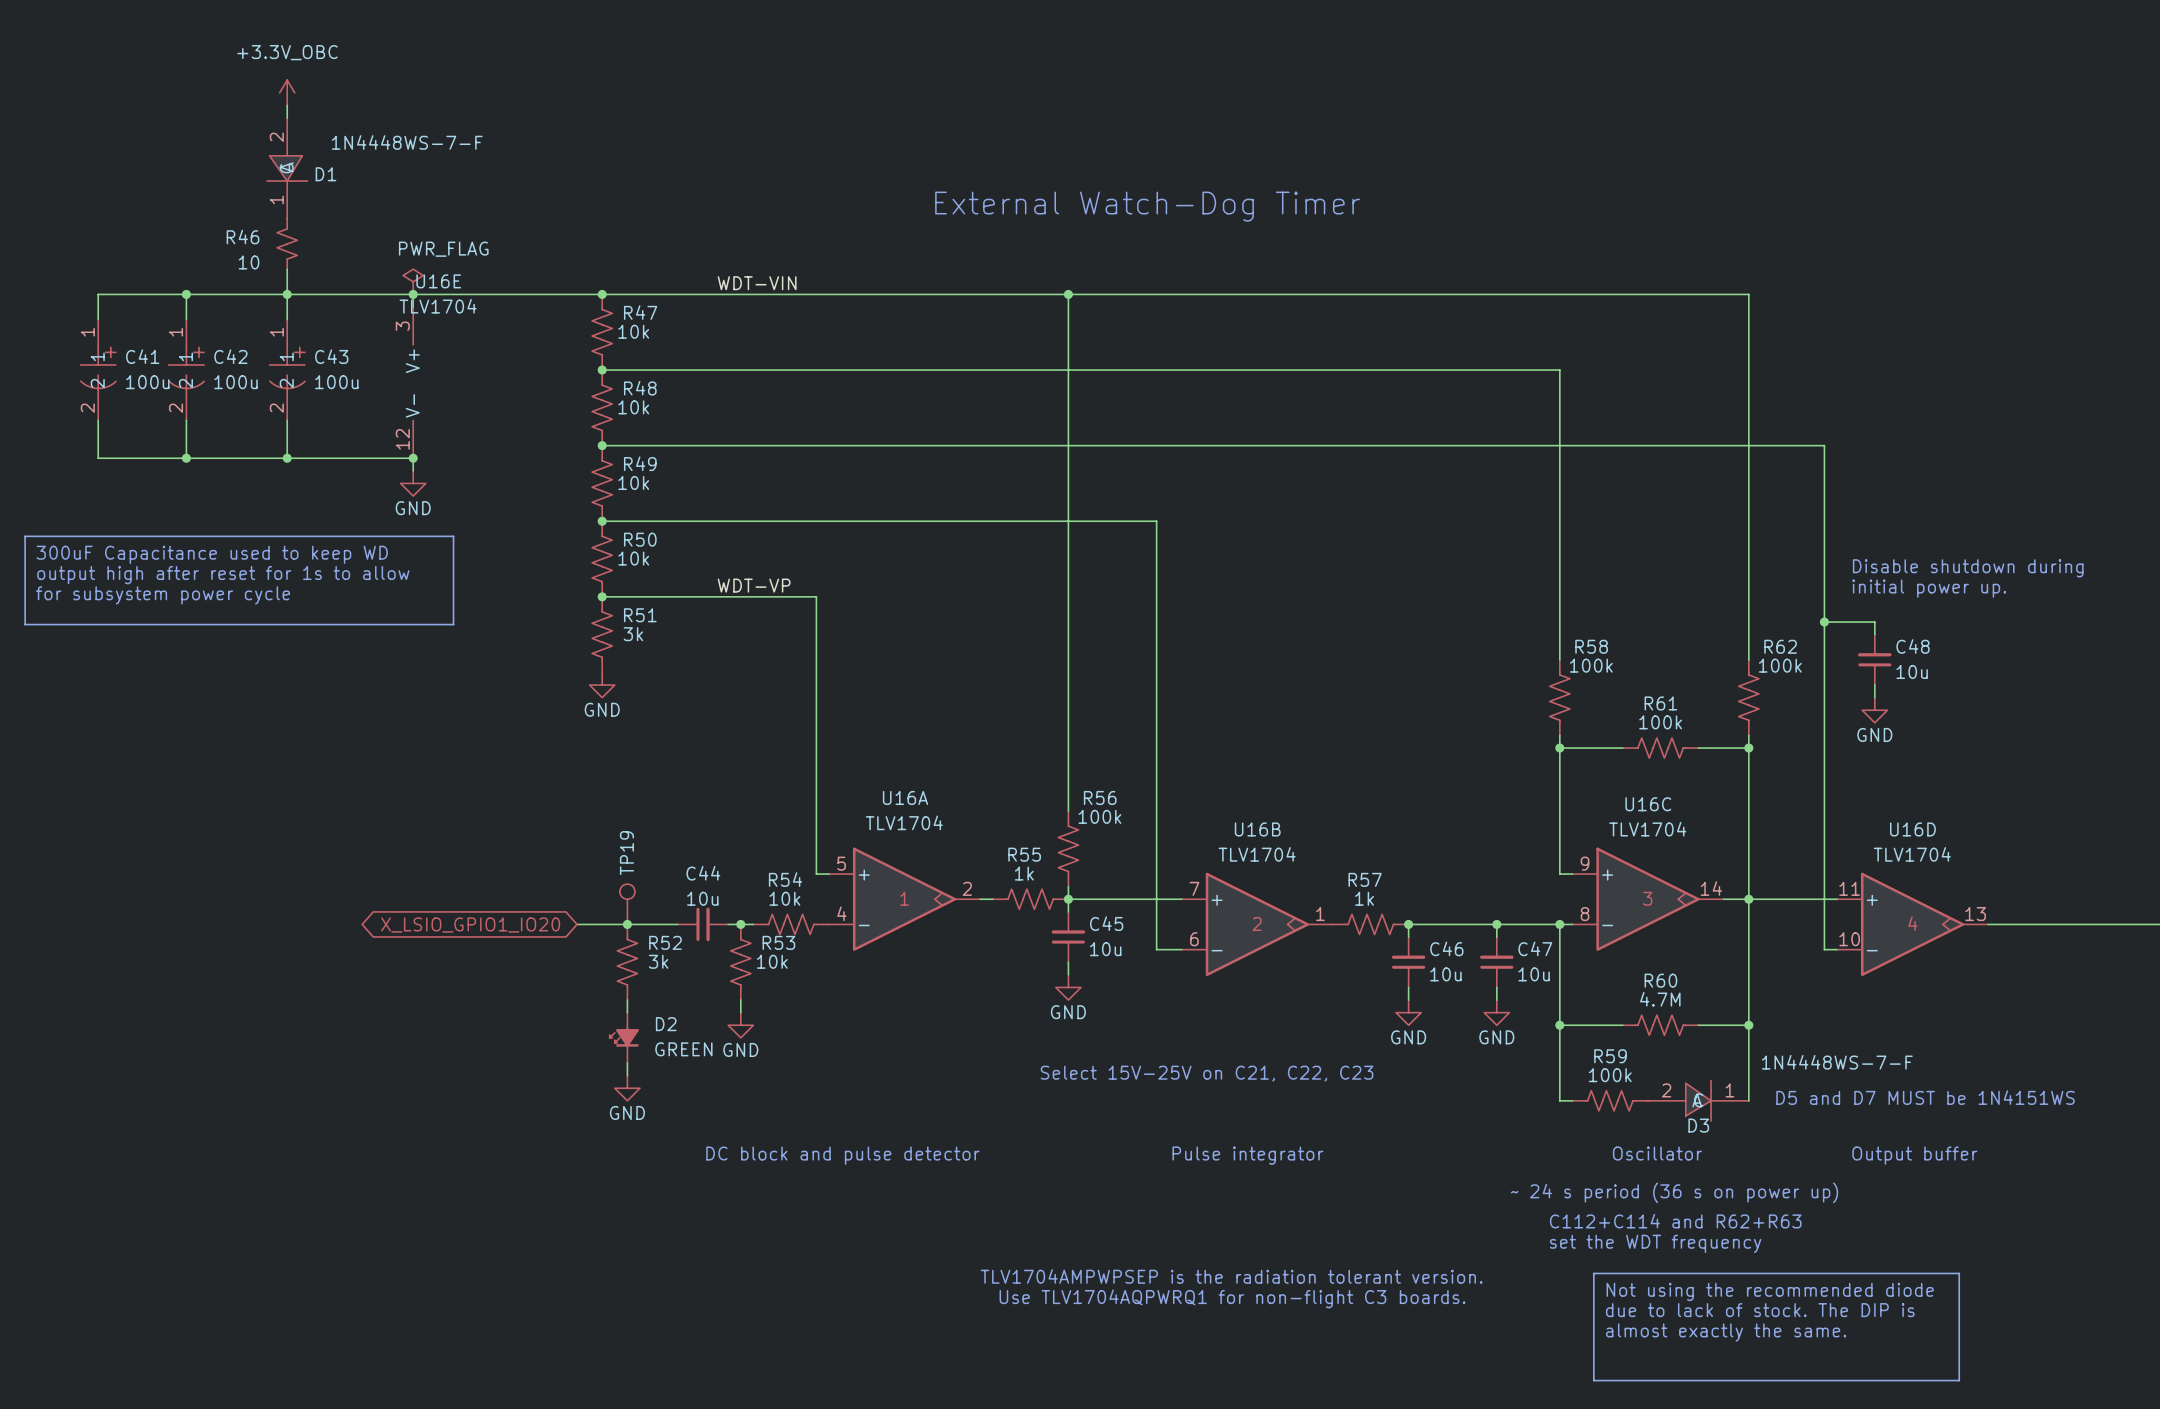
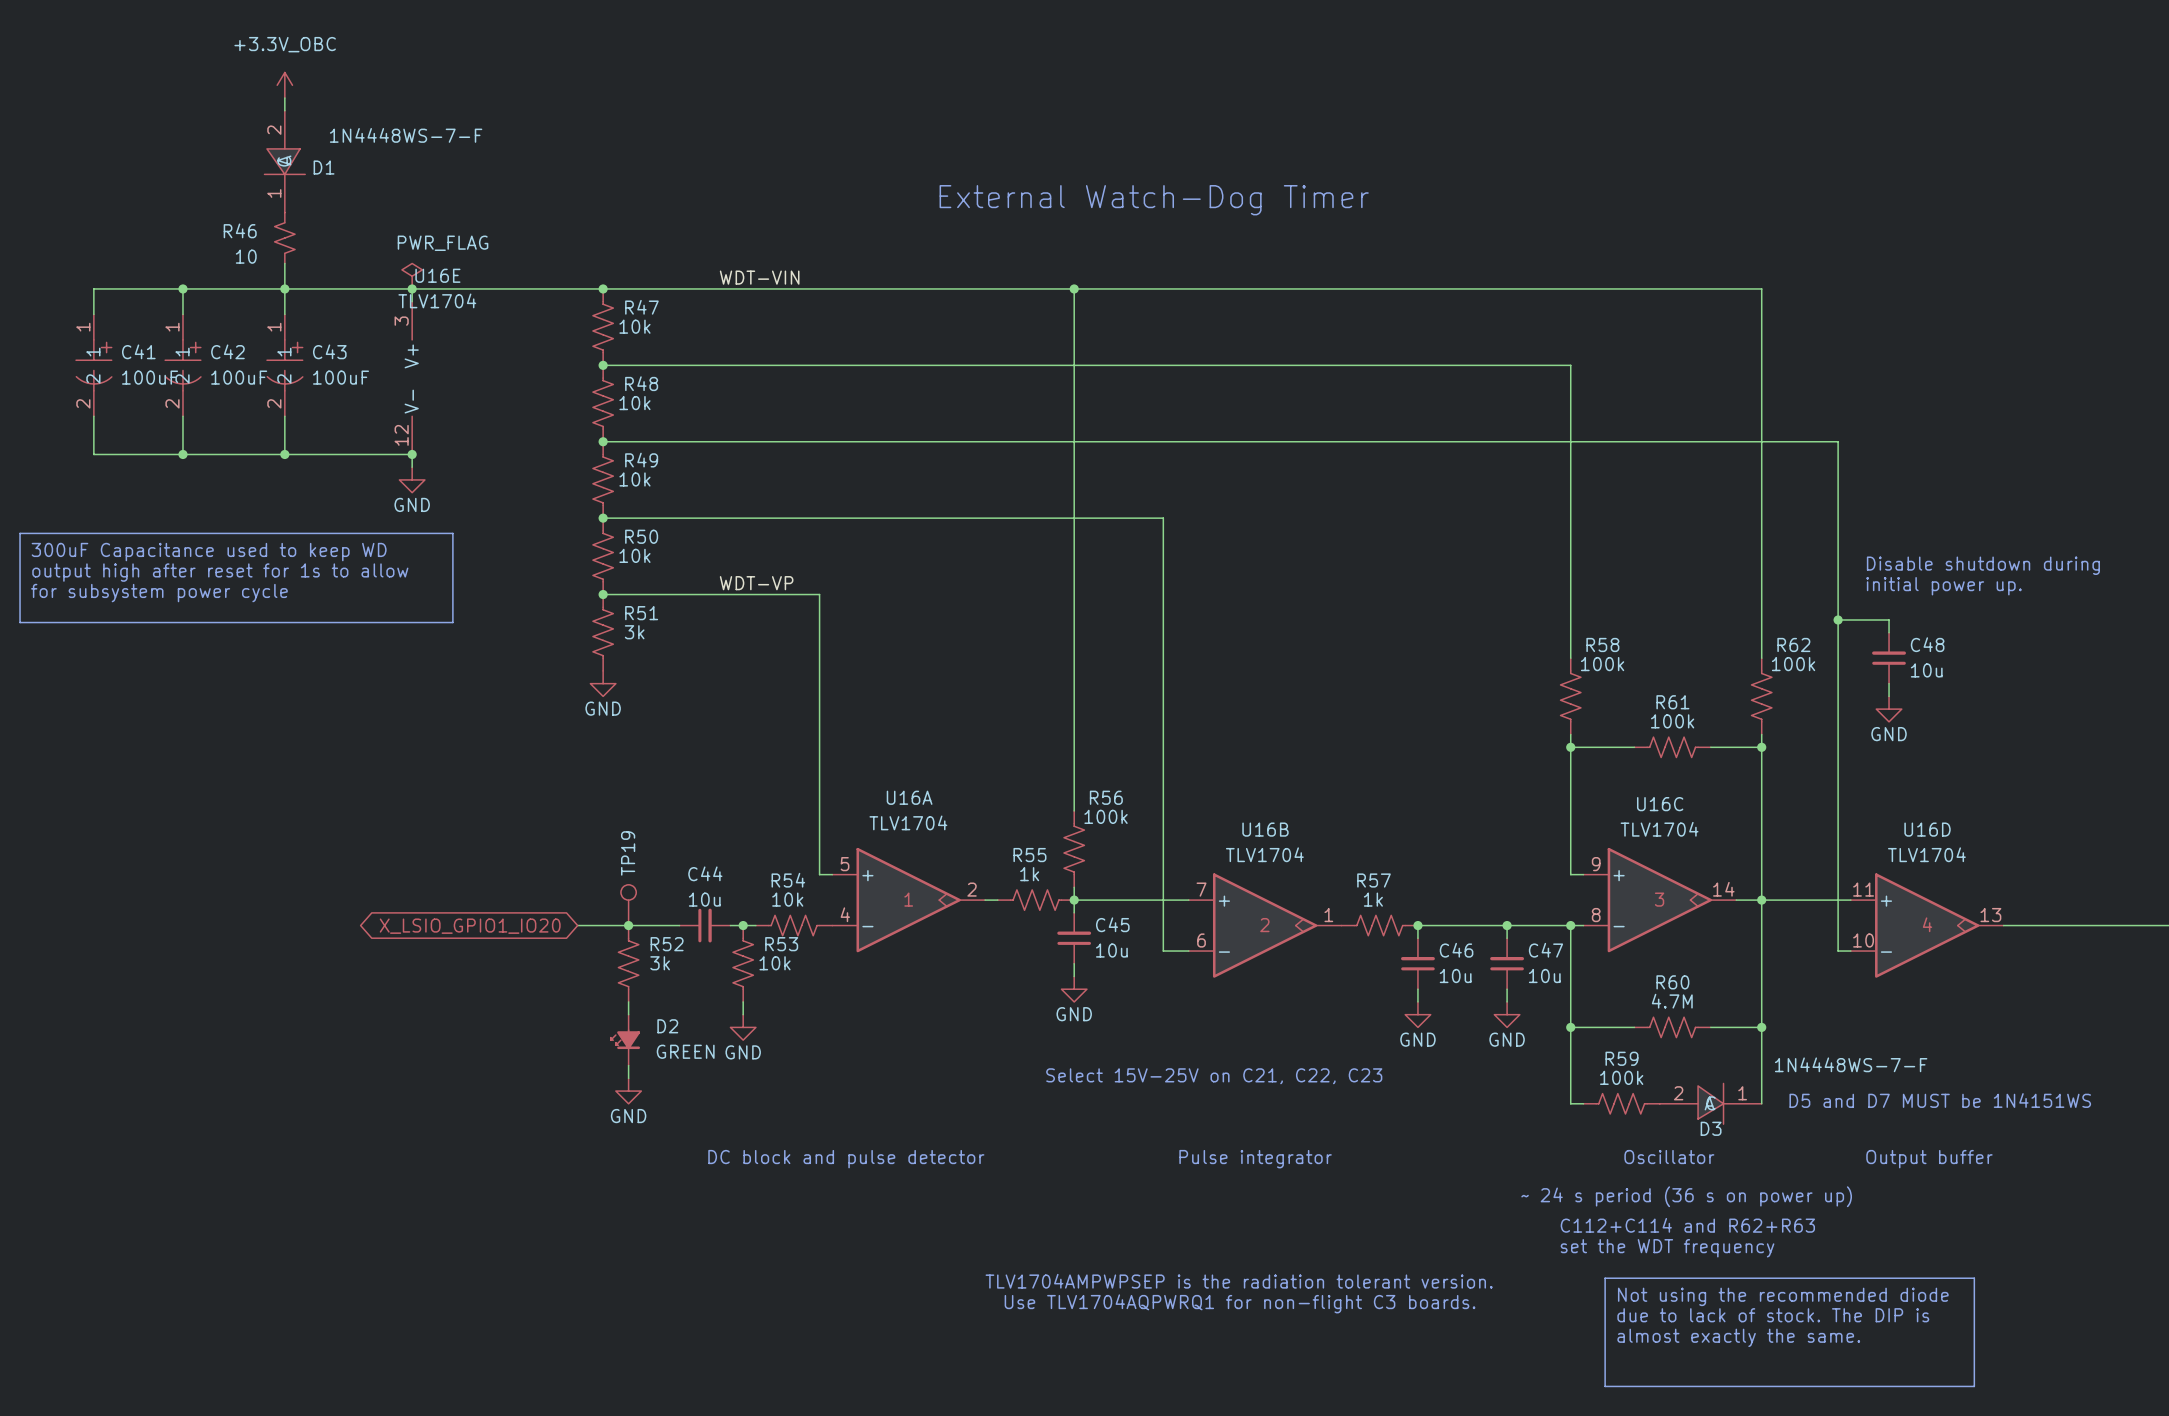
C41 value: 100u (147, 382) -> 100uF (150, 377)
C42 value: 100u (236, 382) -> 100uF (239, 377)
C43 value: 100u (336, 382) -> 100uF (341, 377)

